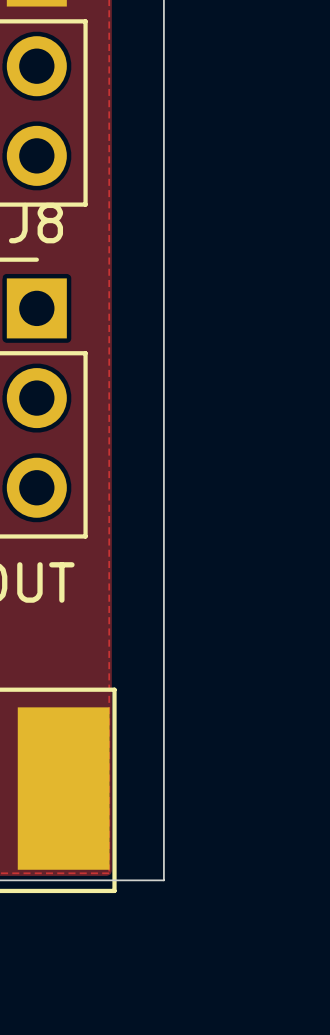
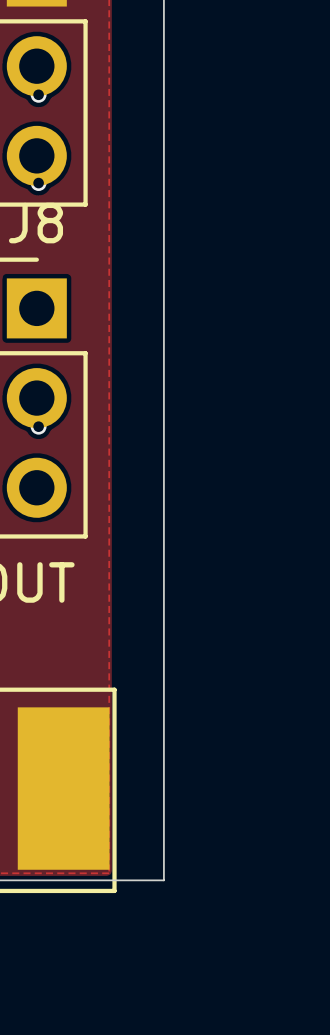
via: none -> (38, 94)
via: none -> (38, 183)
via: none -> (38, 426)

